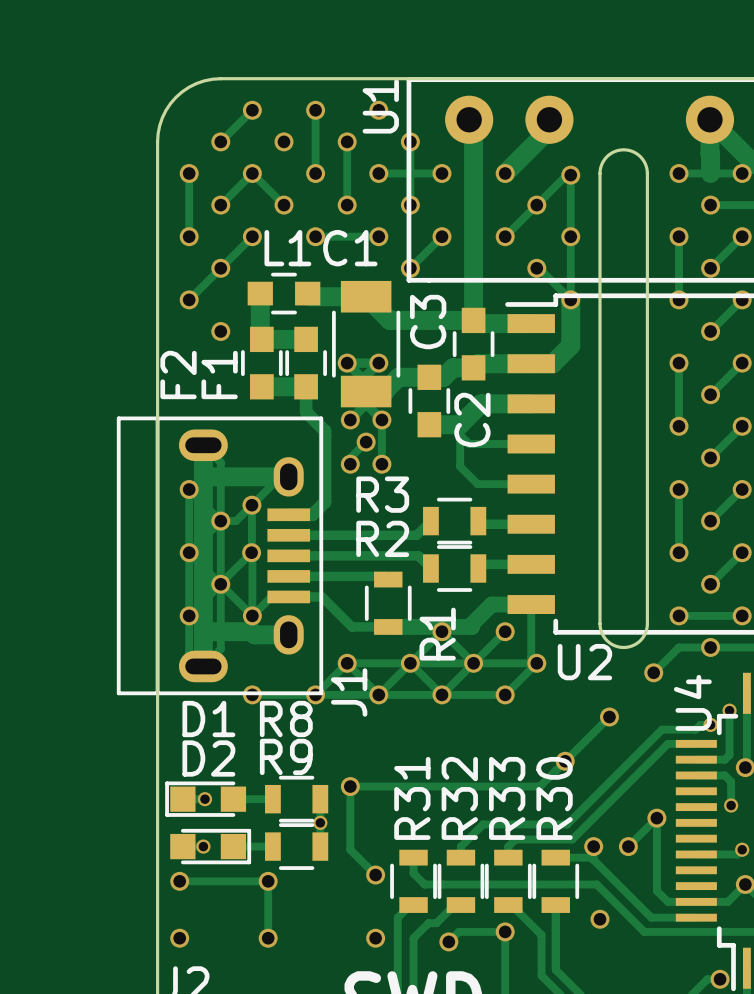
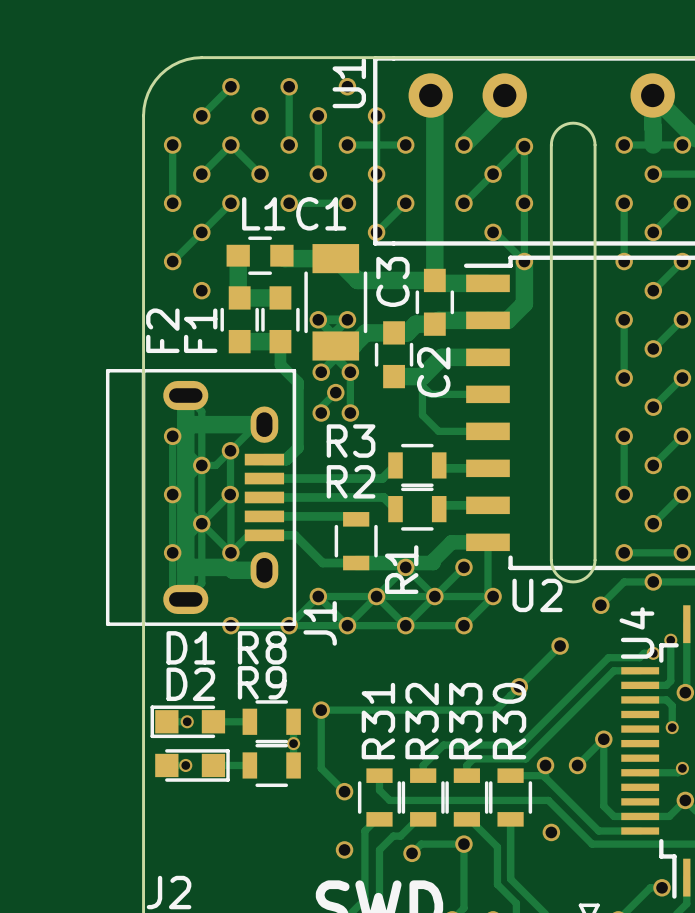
track: (179, 881) (268, 881) (268, 938) -> none
via: (179, 881) -> none
via: (268, 881) -> none
via: (179, 938) -> none
via: (268, 938) -> none

